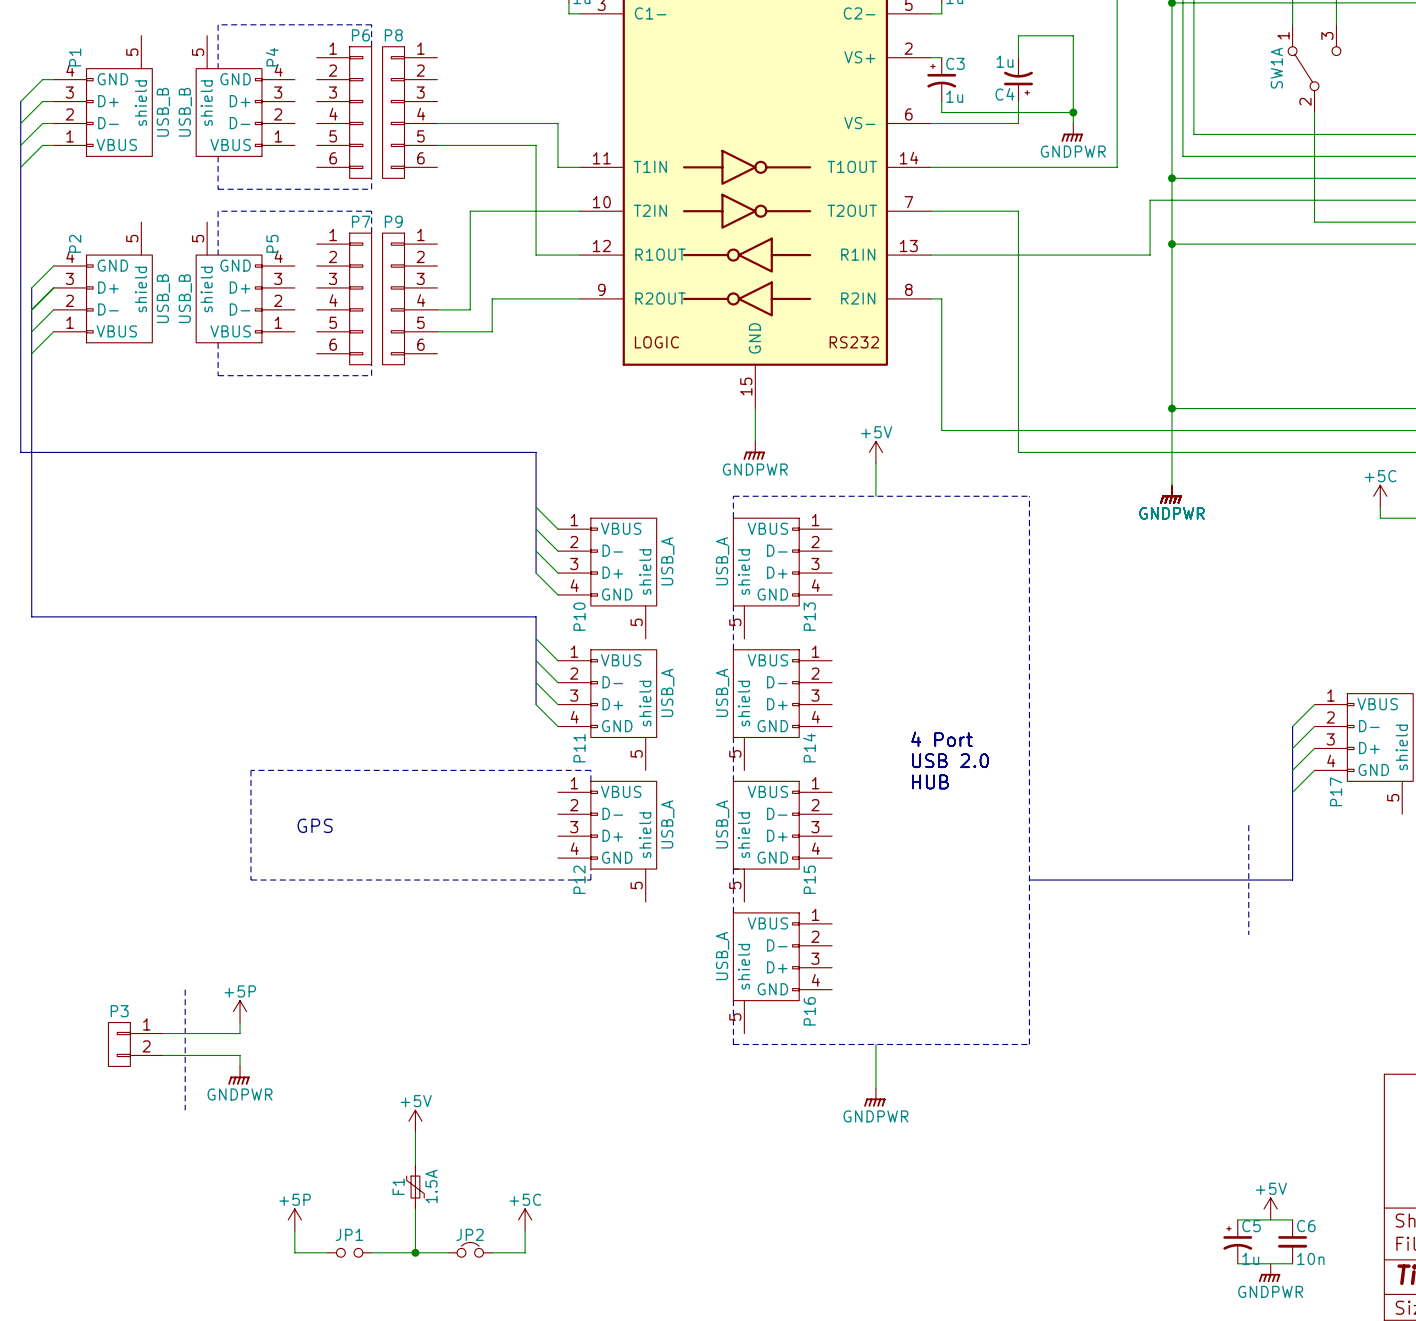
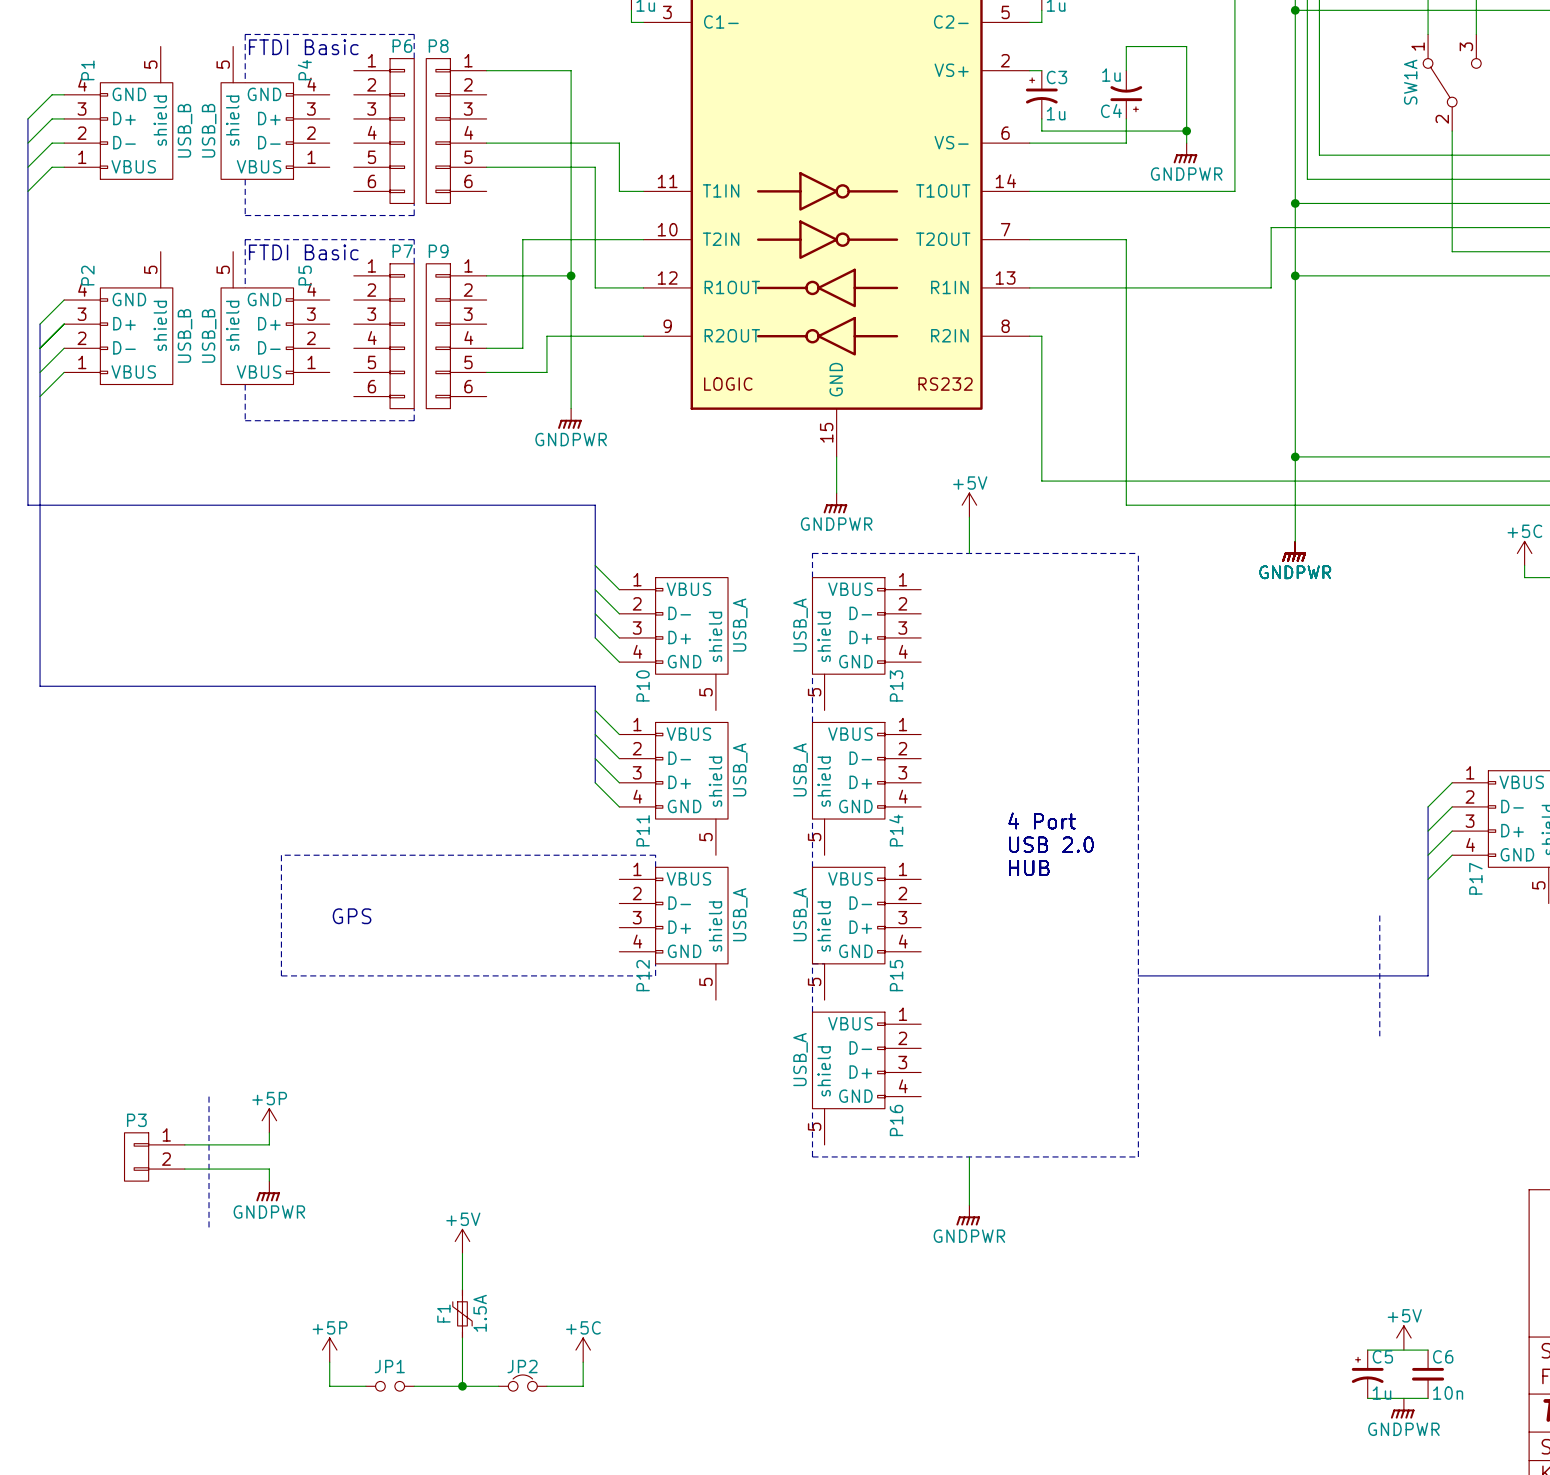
text: none -> FTDI Basic (303, 47)
wire: none -> (486, 70) (571, 70) (571, 408)
text: none -> FTDI Basic (303, 252)
wire: none -> (486, 275) (571, 275)
junction: none -> (571, 275)
power symbol: none -> GNDPWR (569, 418)

